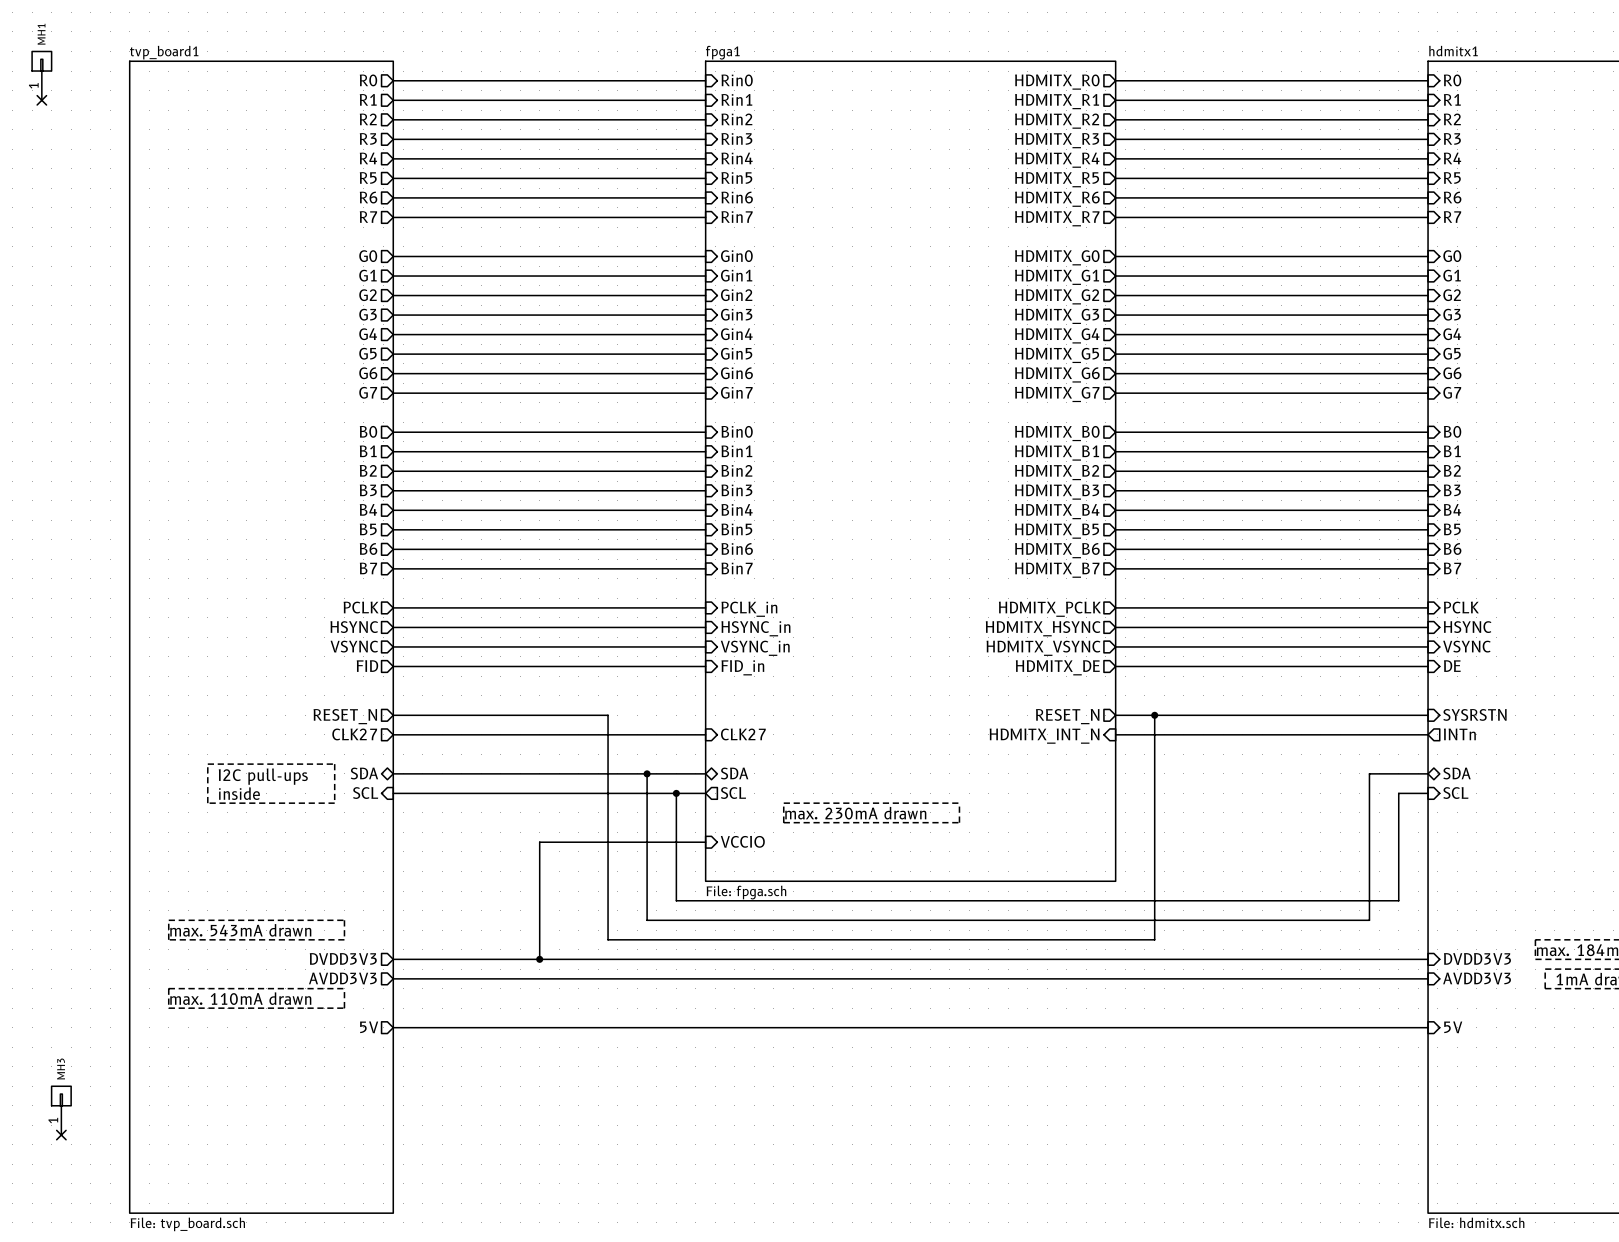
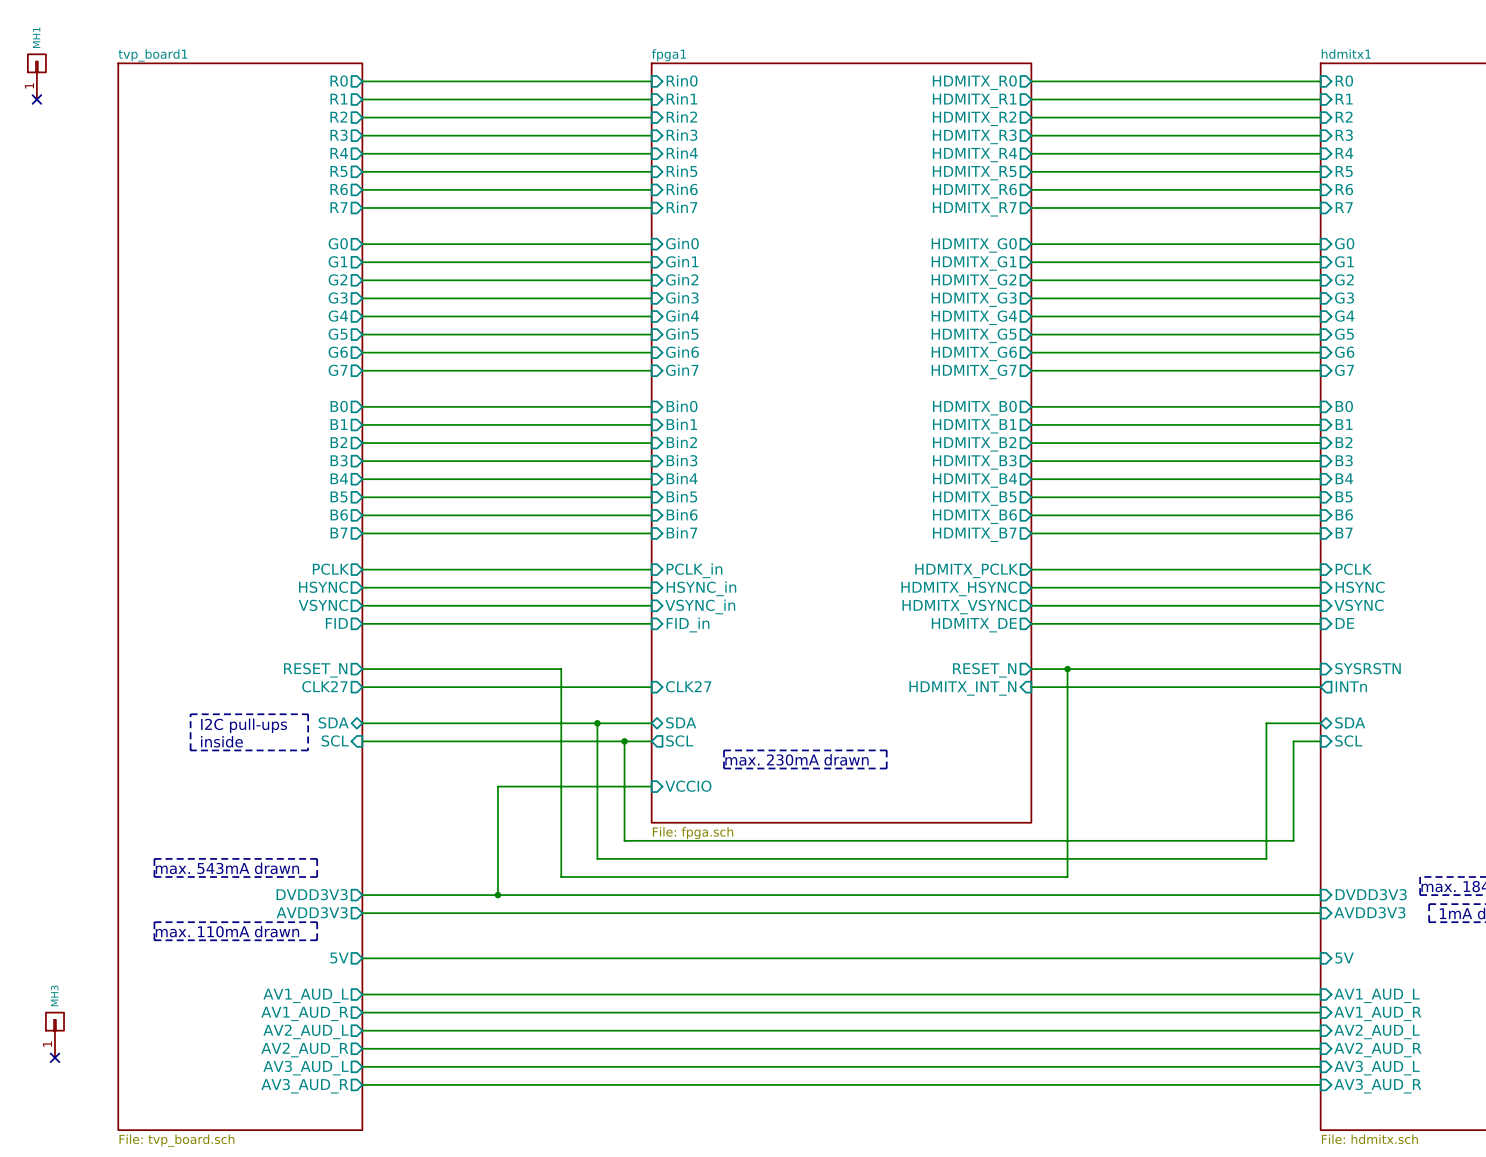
wire: none -> (362, 994) (1320, 994)
sheet pin: none -> AV1_AUD_L (306, 995)
sheet pin: none -> AV1_AUD_L (1377, 995)
wire: none -> (362, 1012) (1320, 1012)
sheet pin: none -> AV1_AUD_R (304, 1013)
sheet pin: none -> AV1_AUD_R (1377, 1013)
wire: none -> (362, 1030) (1320, 1030)
sheet pin: none -> AV2_AUD_L (306, 1031)
sheet pin: none -> AV2_AUD_L (1377, 1031)
wire: none -> (362, 1048) (1320, 1048)
sheet pin: none -> AV2_AUD_R (304, 1050)
sheet pin: none -> AV2_AUD_R (1377, 1050)
wire: none -> (362, 1066) (1320, 1066)
sheet pin: none -> AV3_AUD_L (306, 1068)
sheet pin: none -> AV3_AUD_L (1377, 1068)
wire: none -> (362, 1084) (1320, 1084)
sheet pin: none -> AV3_AUD_R (304, 1086)
sheet pin: none -> AV3_AUD_R (1377, 1086)

